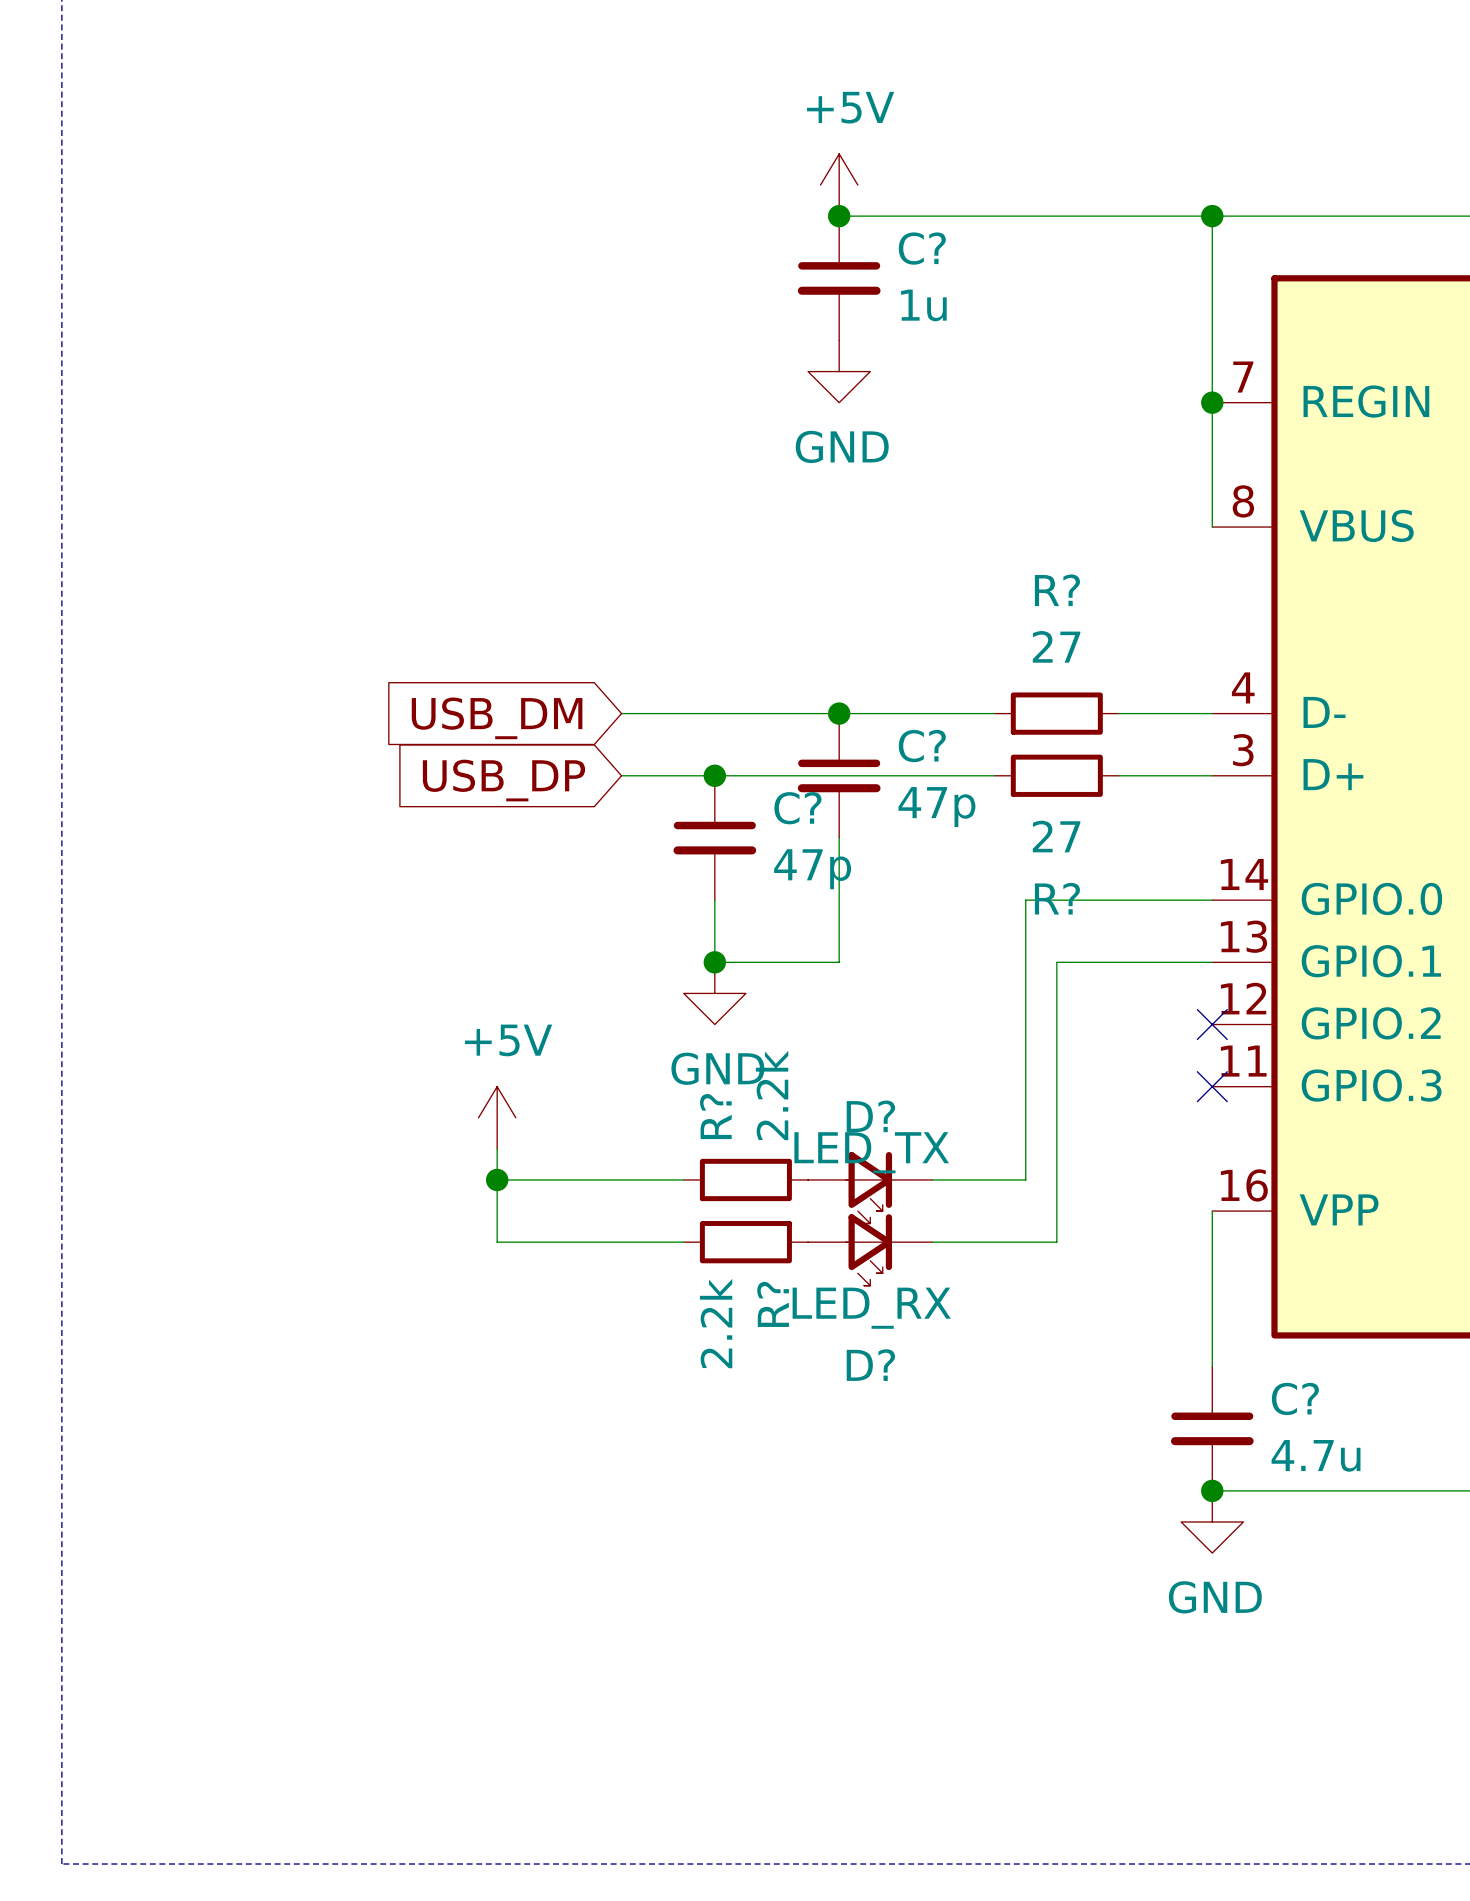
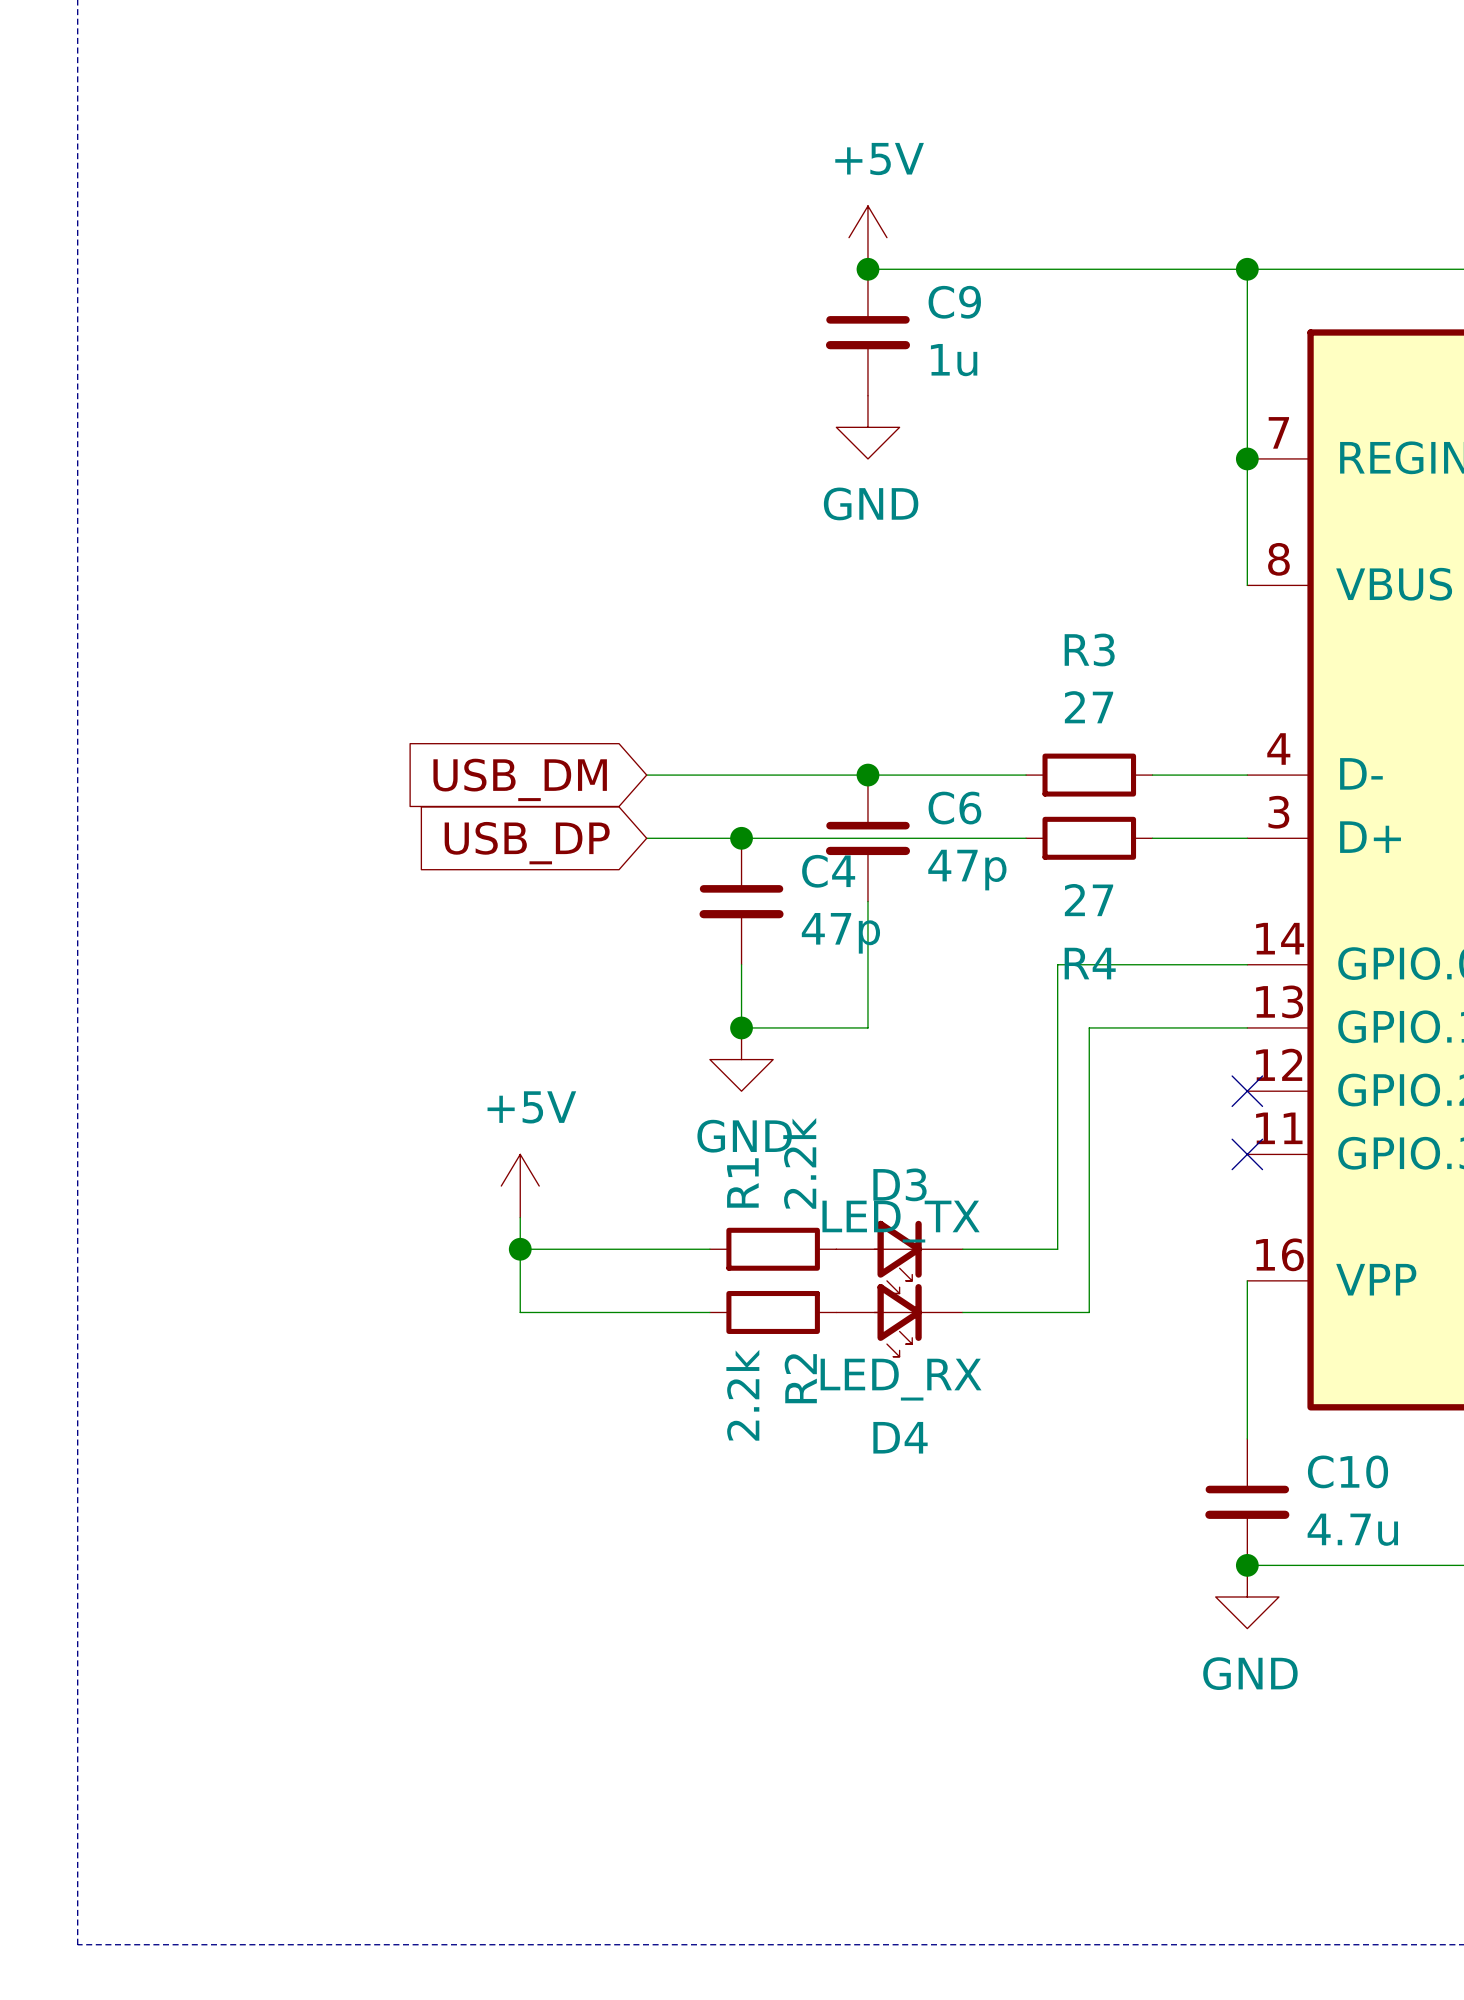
C? name: C? (922, 248) -> C9 (954, 302)
R? name: R? (1057, 590) -> R3 (1089, 649)
C? name: C? (922, 746) -> C6 (954, 808)
C? name: C? (797, 808) -> C4 (828, 871)
R? name: R? (1057, 898) -> R4 (1090, 963)
R? name: R? (715, 1116) -> R1 (742, 1182)
D? name: D? (870, 1116) -> D3 (899, 1184)
R? name: R? (773, 1304) -> R2 (800, 1378)
D? name: D? (870, 1365) -> D4 (900, 1437)
C? name: C? (1295, 1398) -> C10 (1348, 1471)

